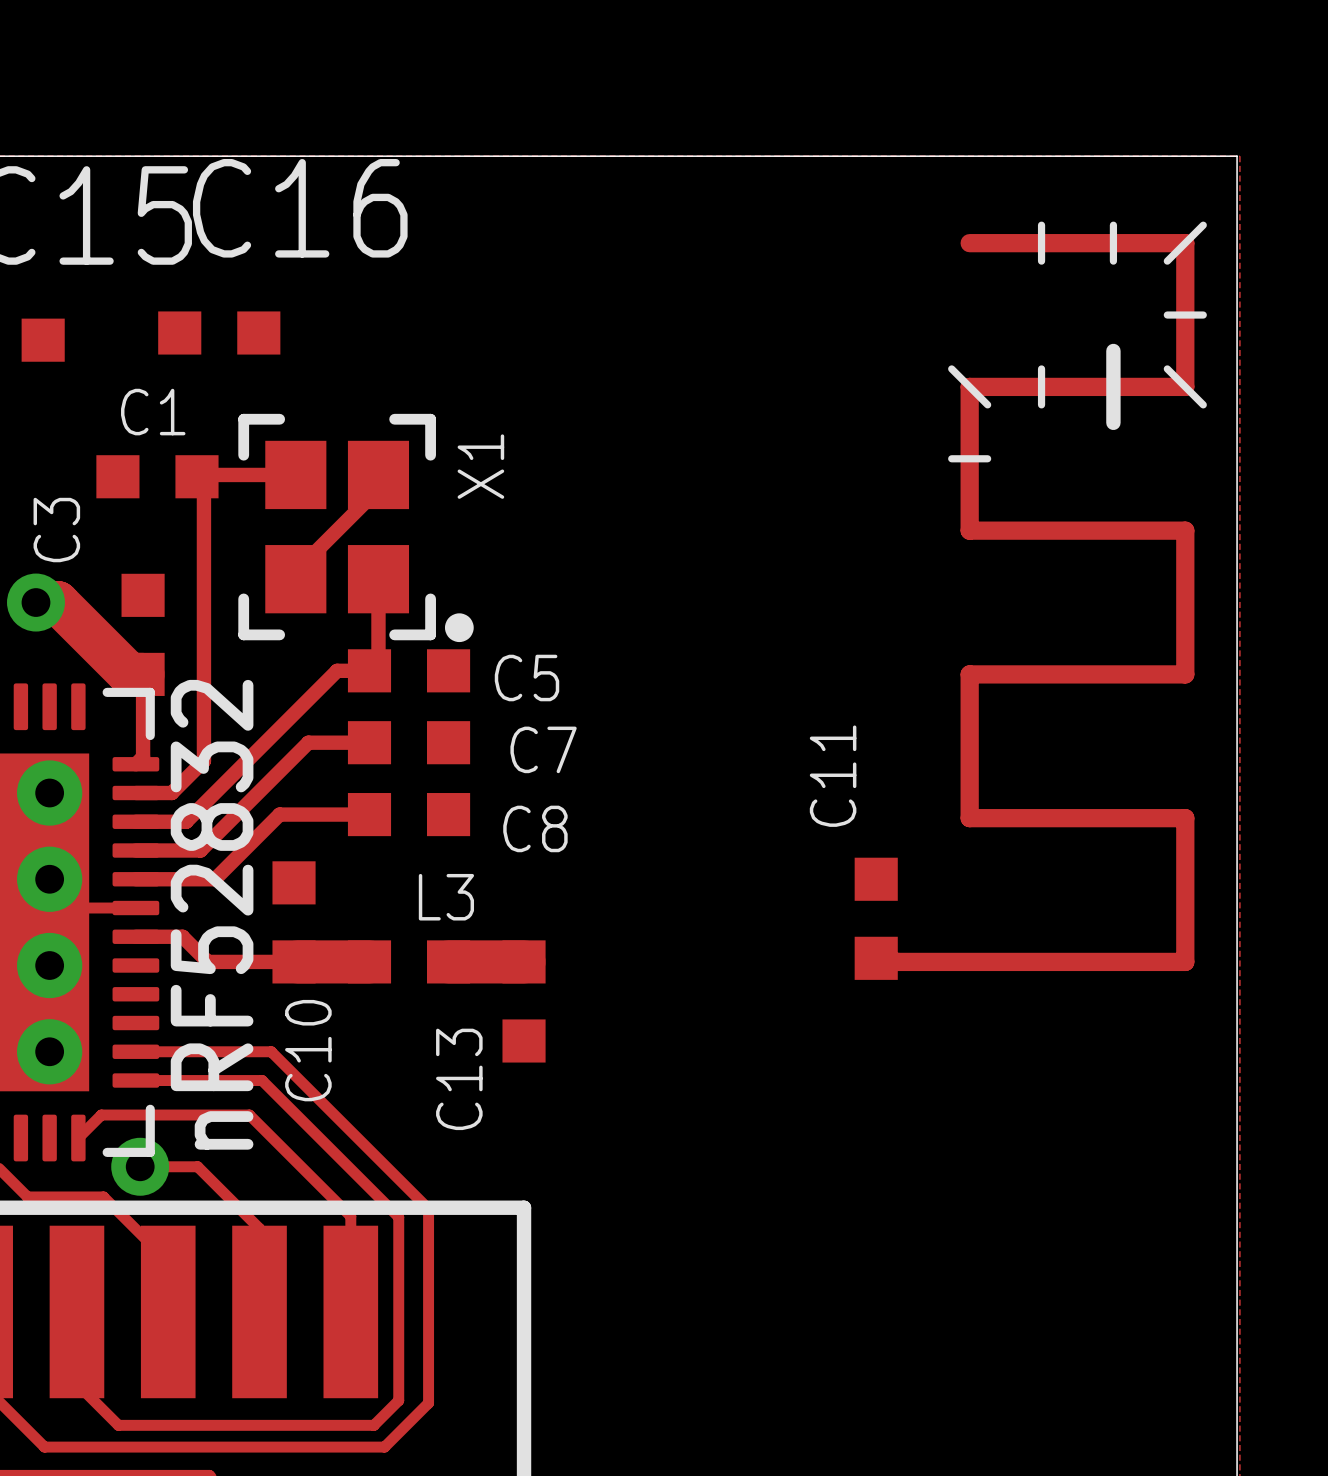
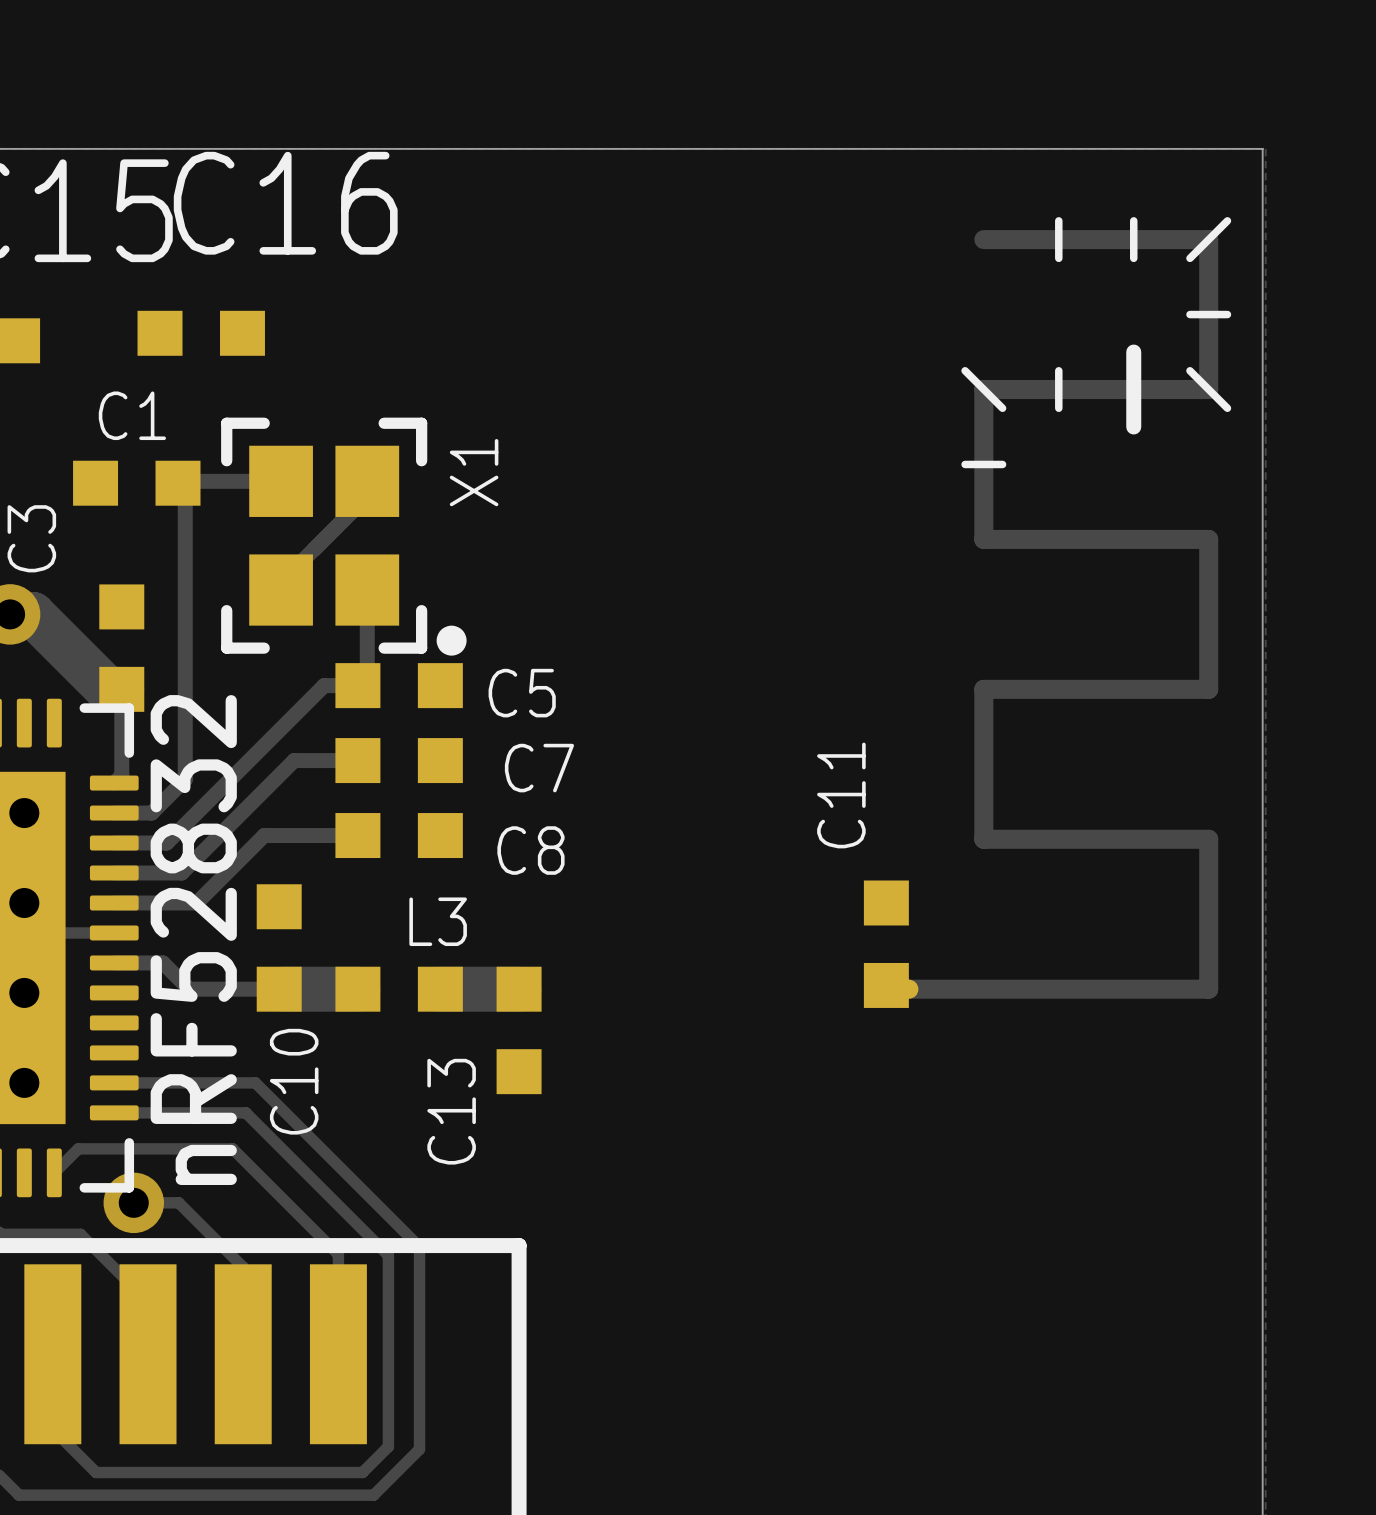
via position: (140, 1166) -> (133, 1202)

